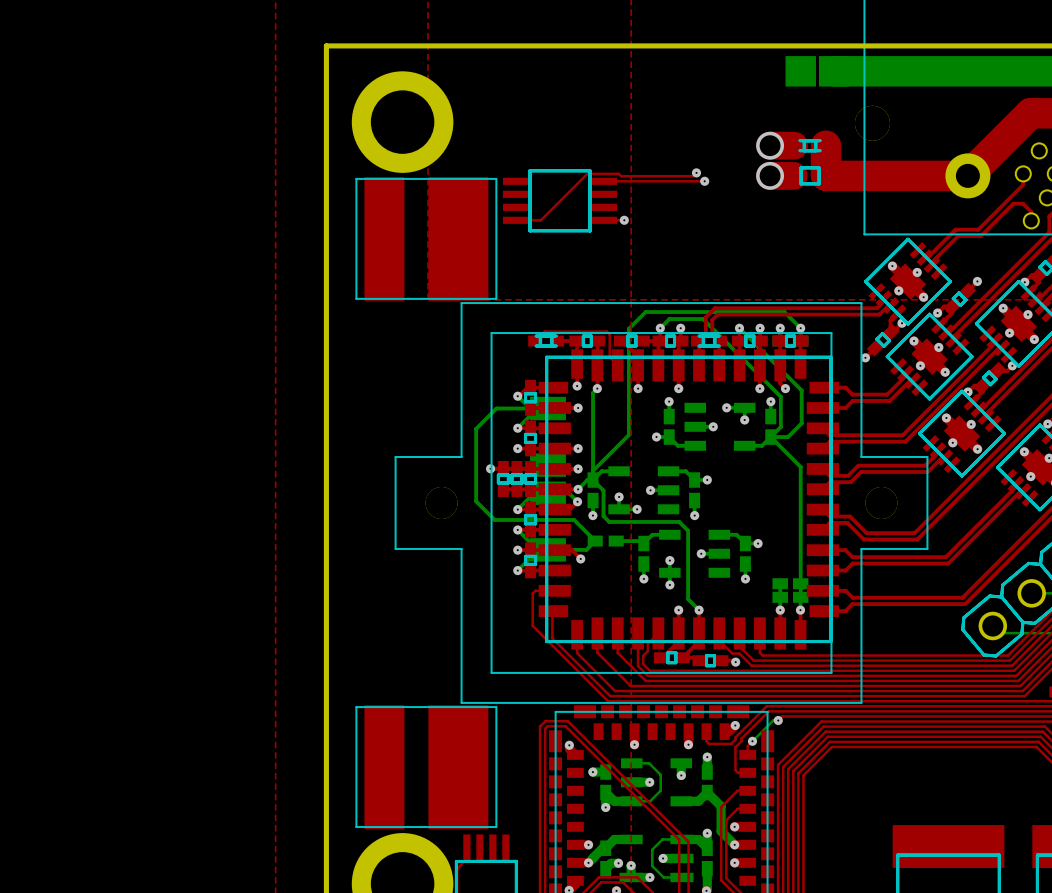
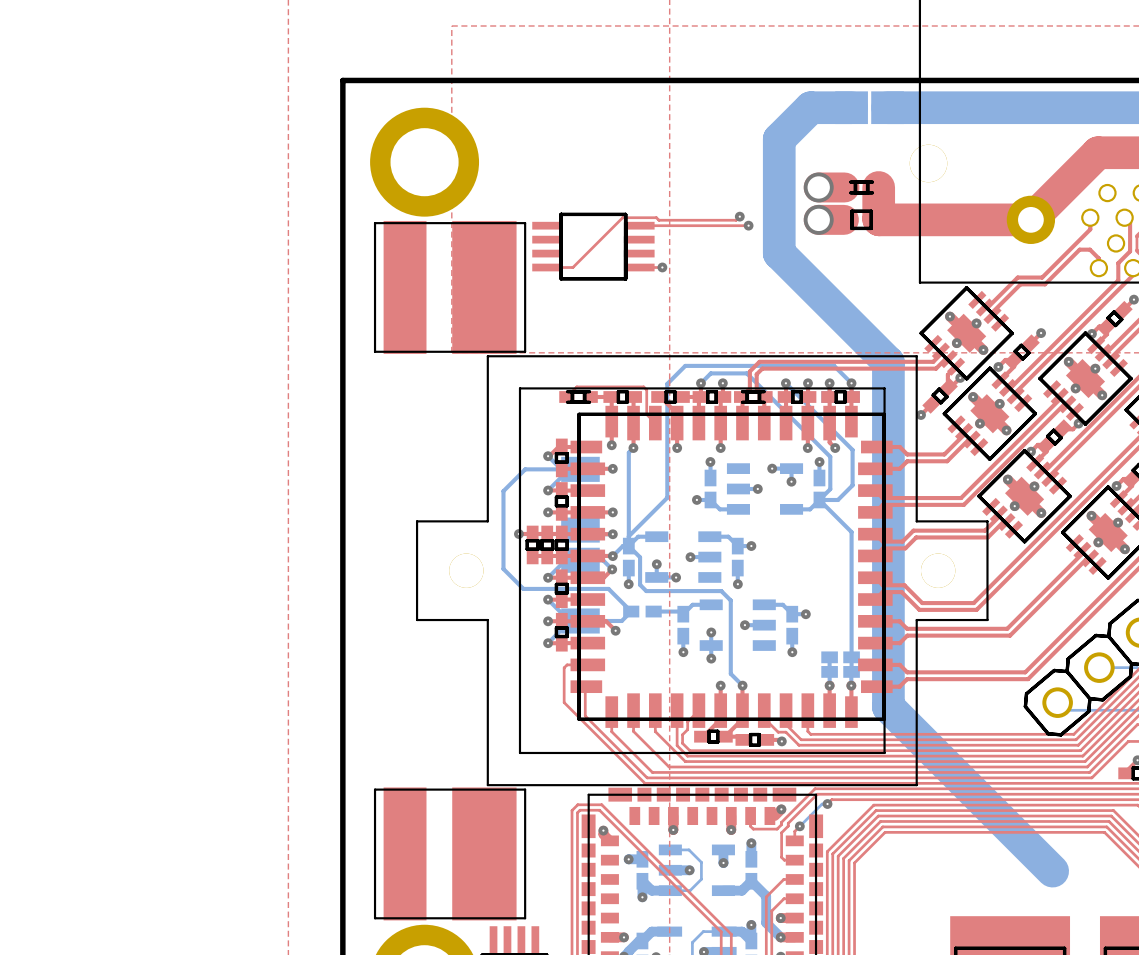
bottom track: none -> (851, 107) (810, 107) (779, 139) (779, 253) (888, 362) (888, 706) (1052, 871)

